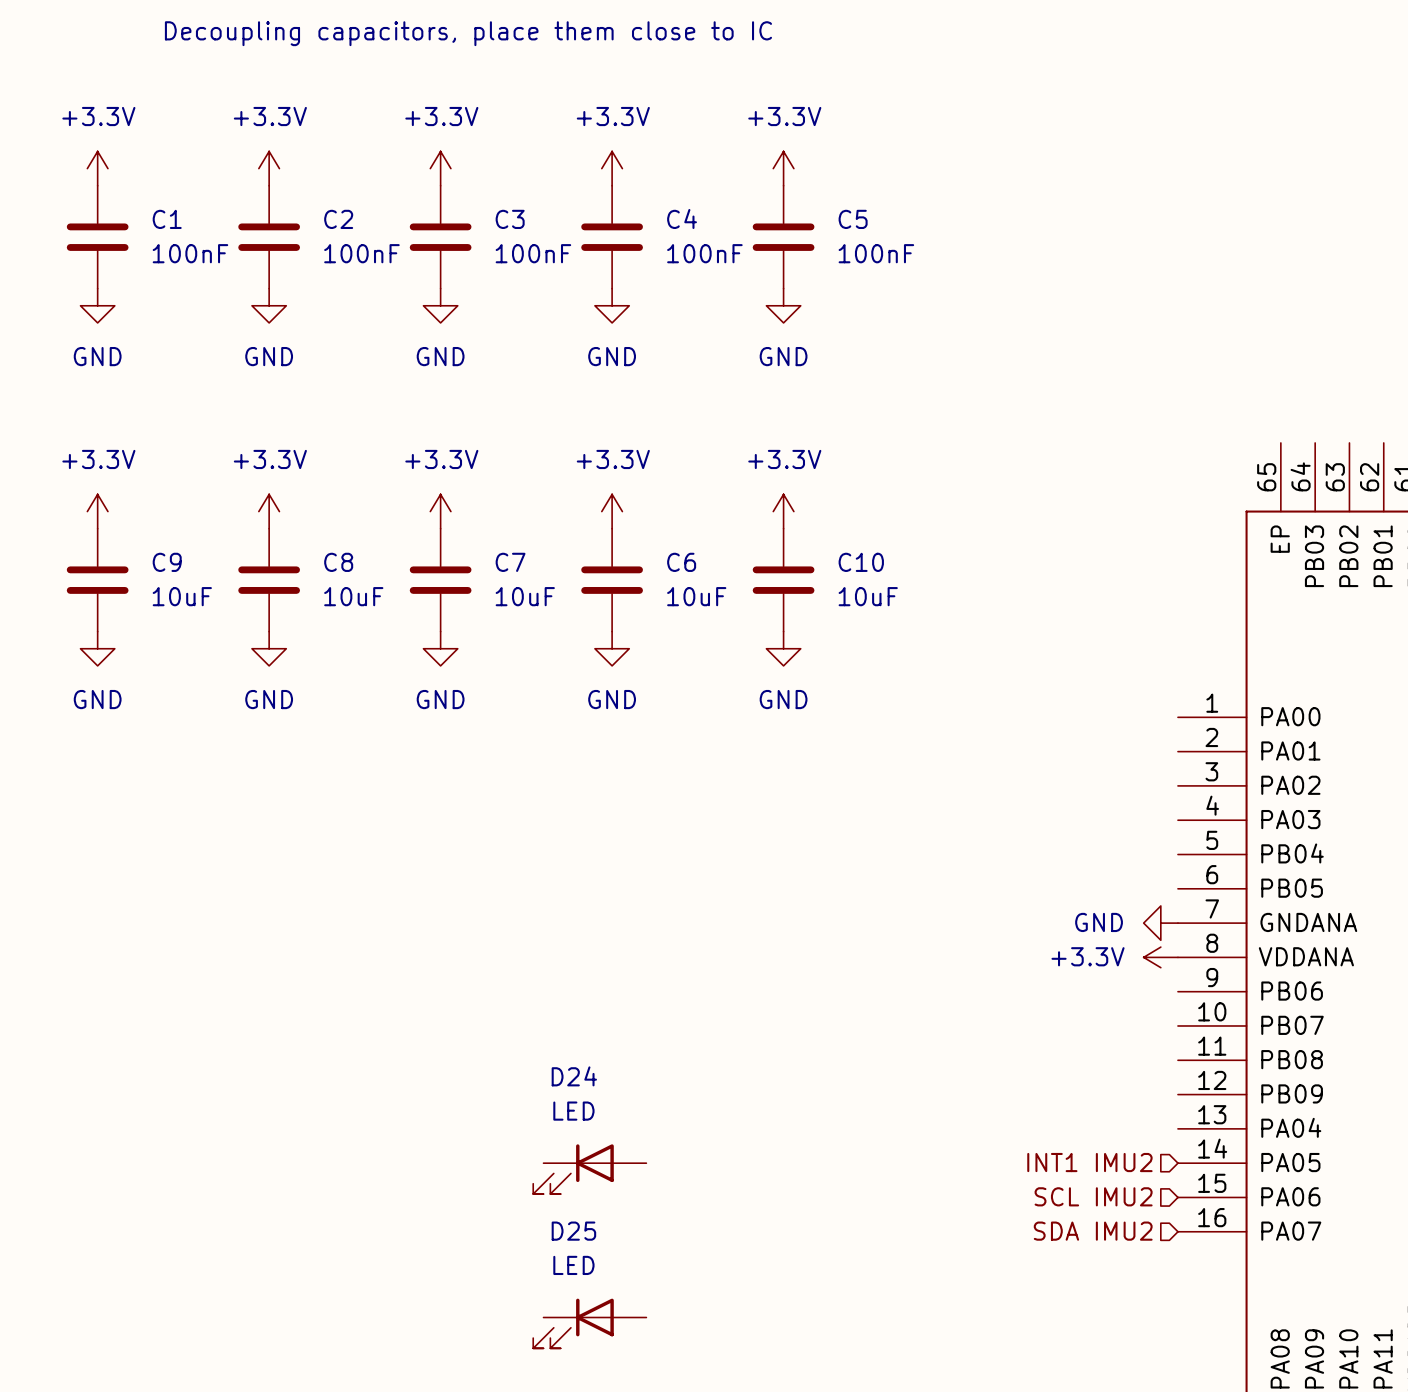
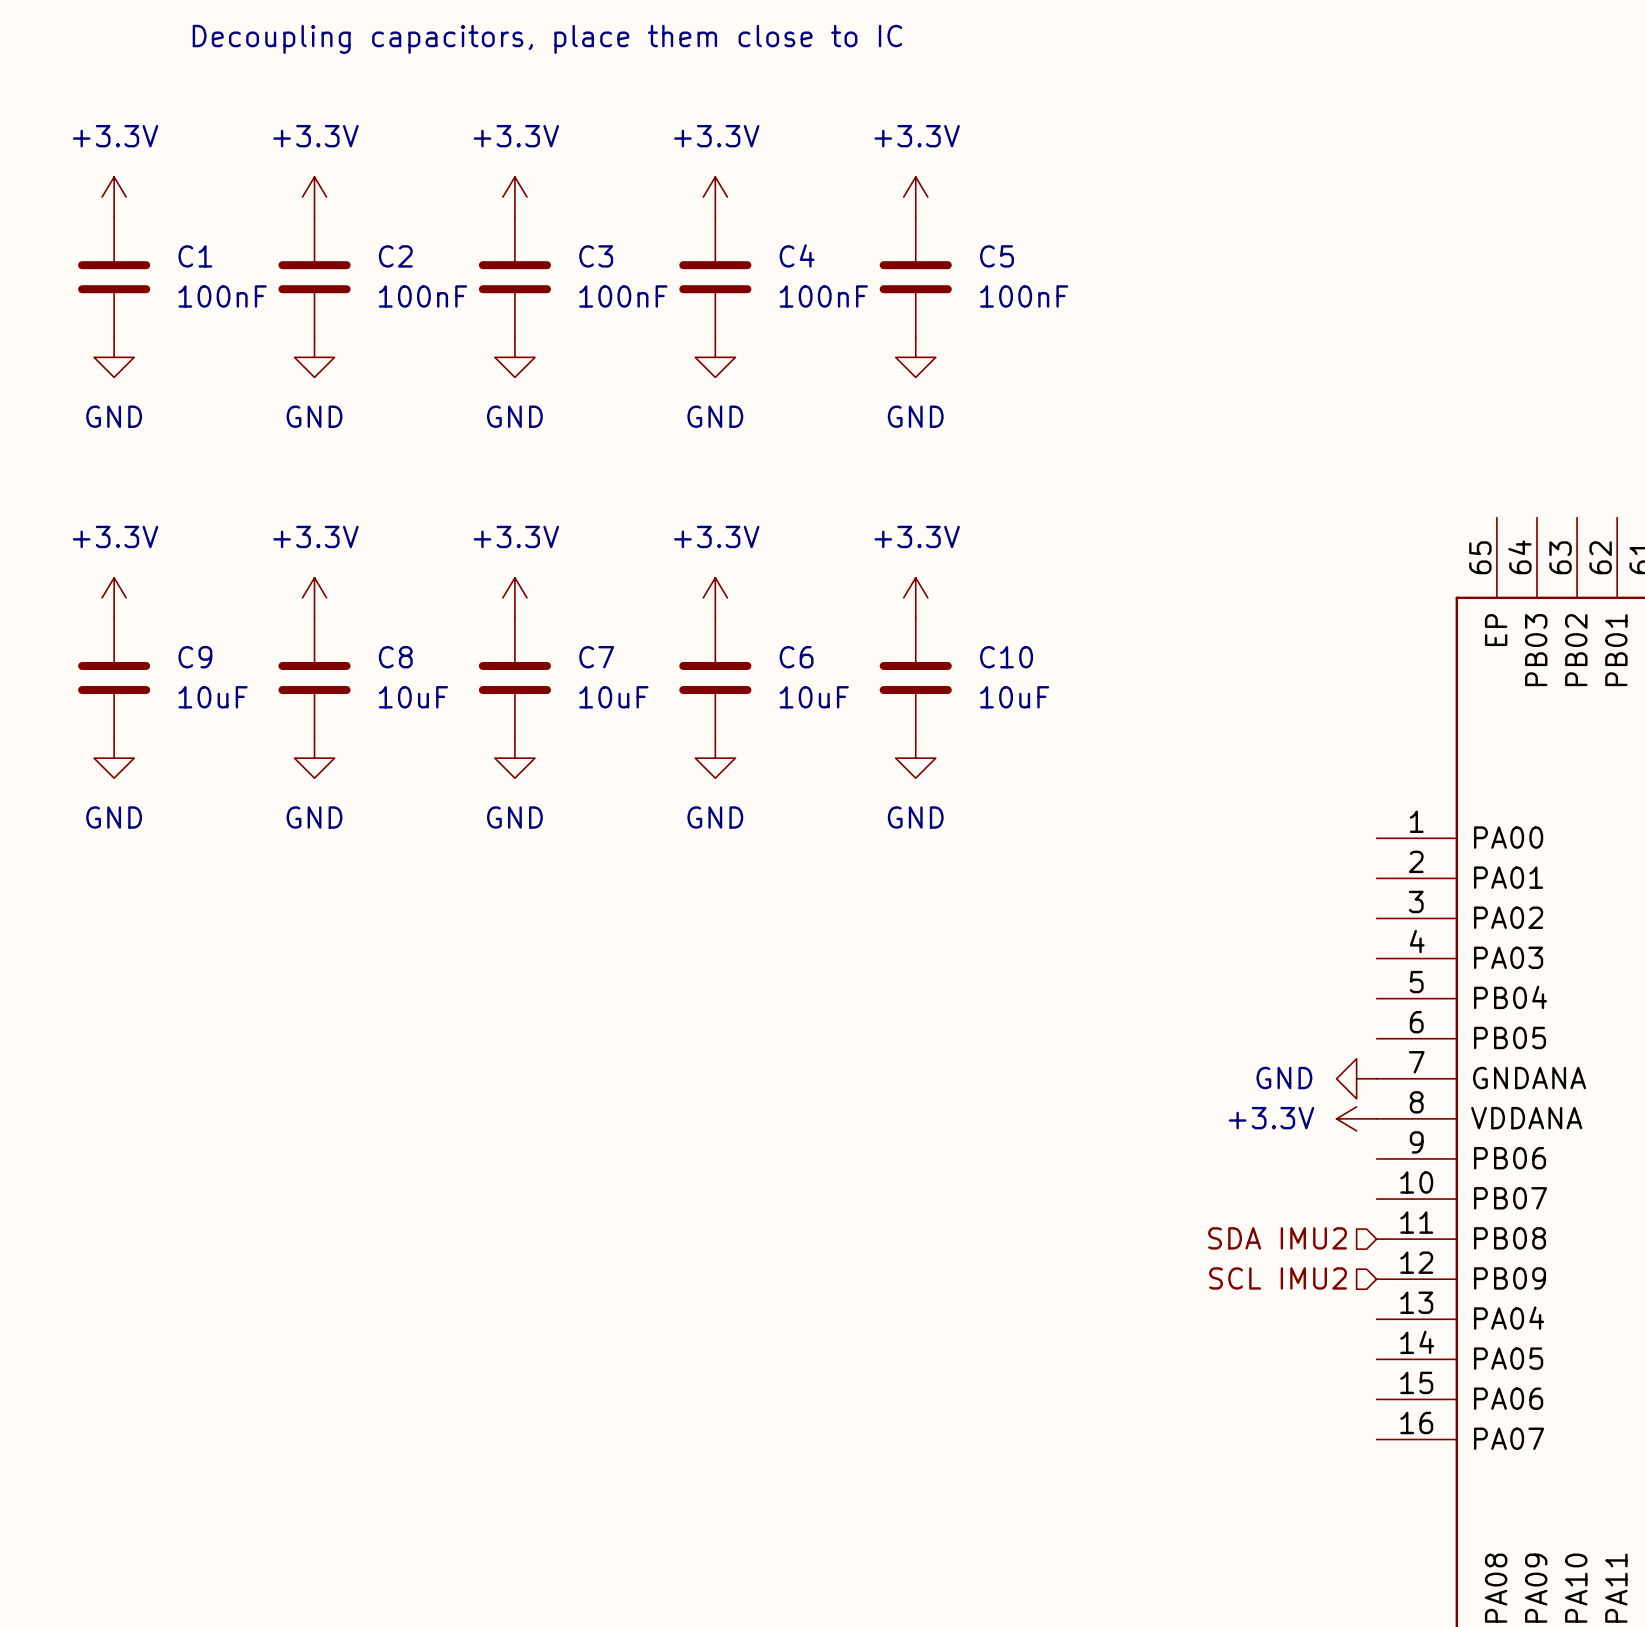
hierarchical label: INT1 IMU2 (1089, 1162) -> none
D24: LED (589, 1169) -> none
hierarchical label position: SCL IMU2 (1093, 1196) -> SCL IMU2 (1278, 1278)
hierarchical label position: SDA IMU2 (1093, 1231) -> SDA IMU2 (1277, 1238)
D25: LED (589, 1323) -> none

